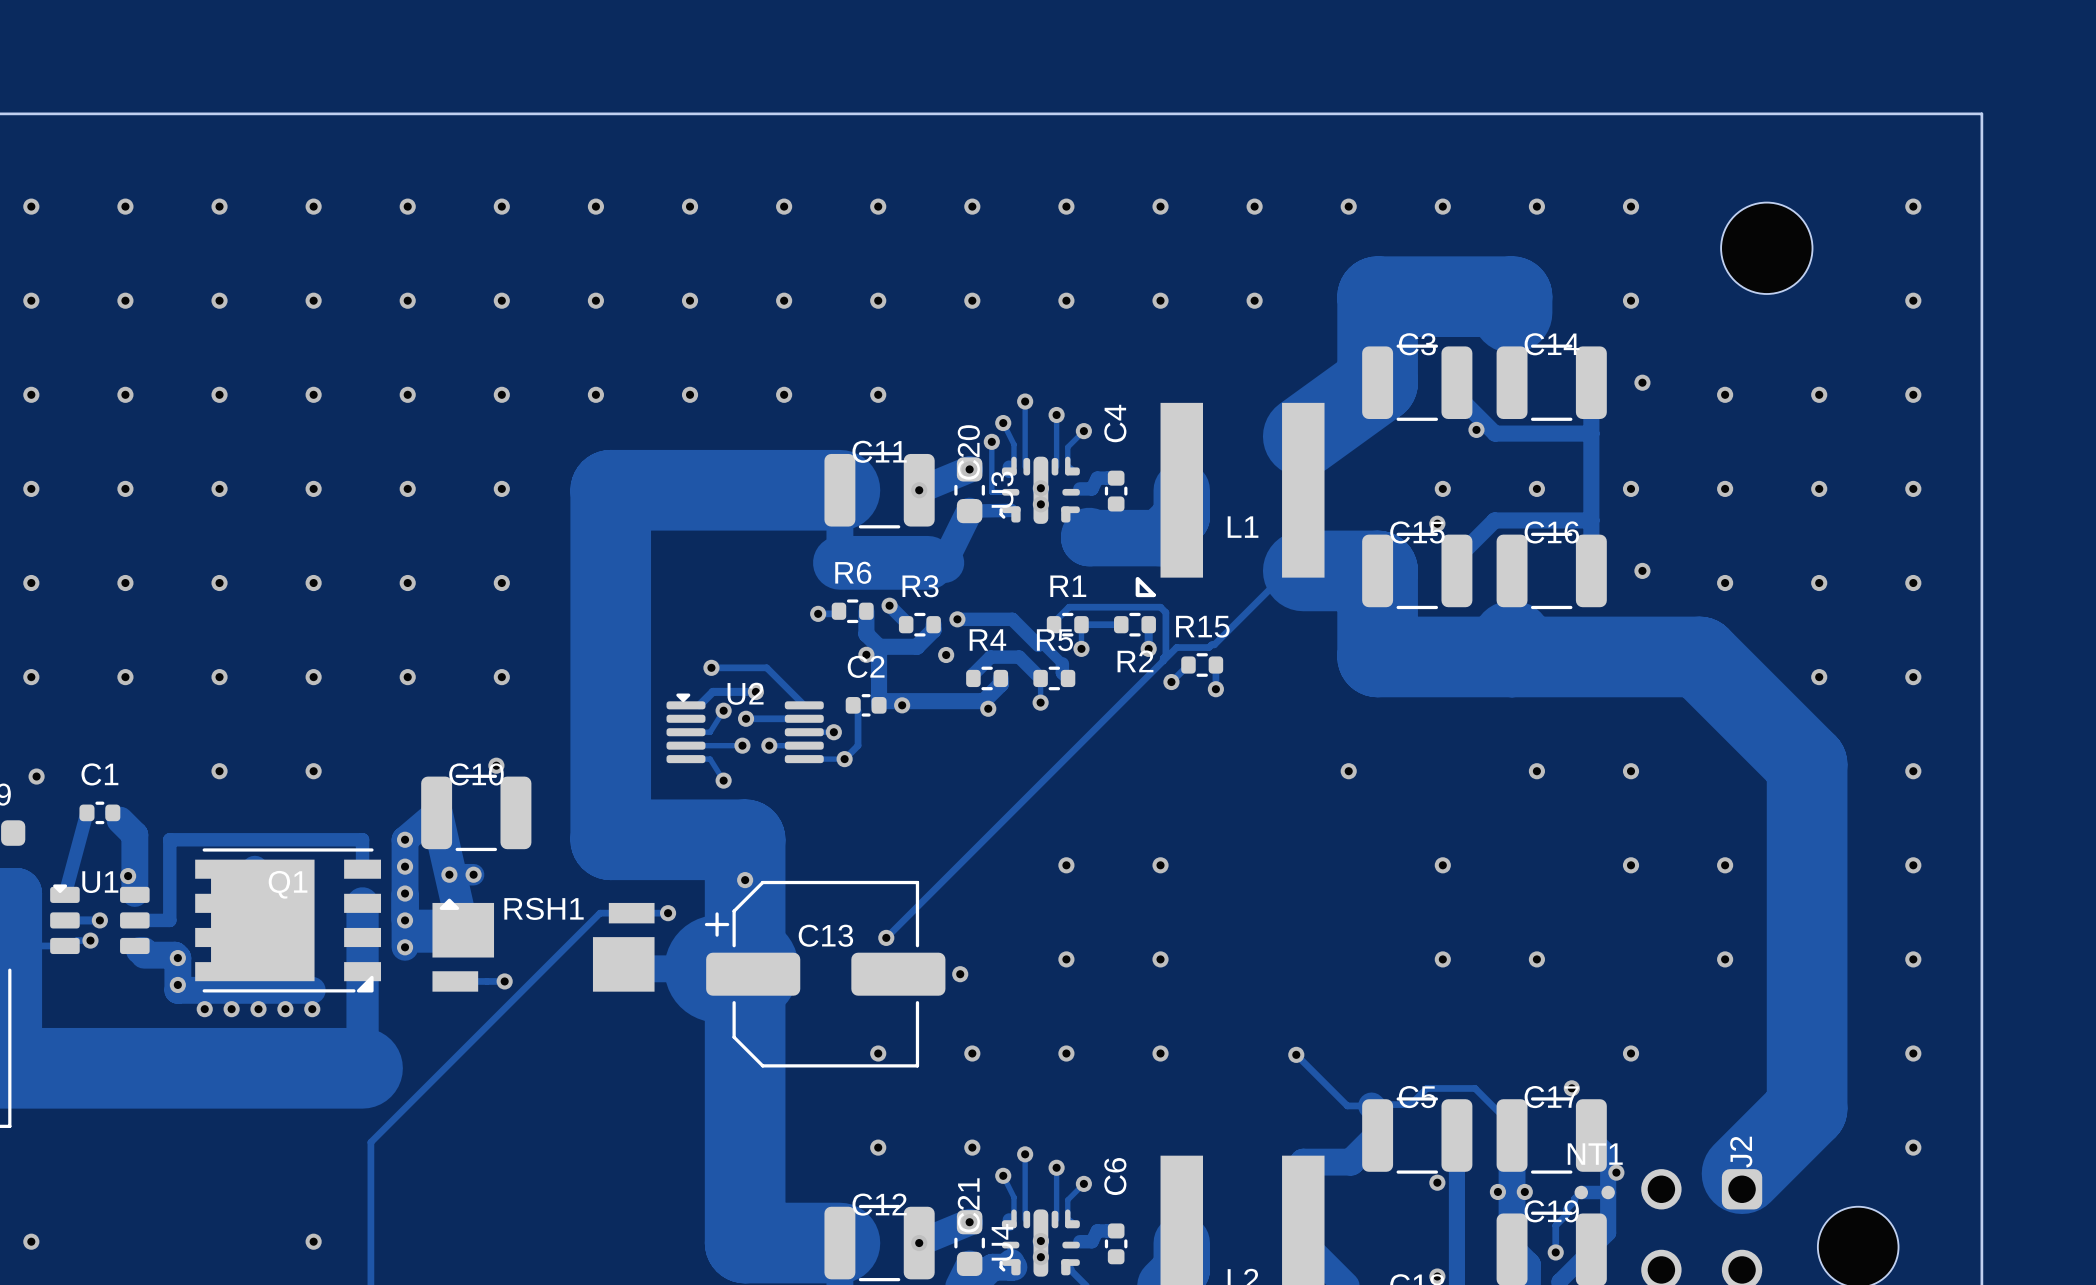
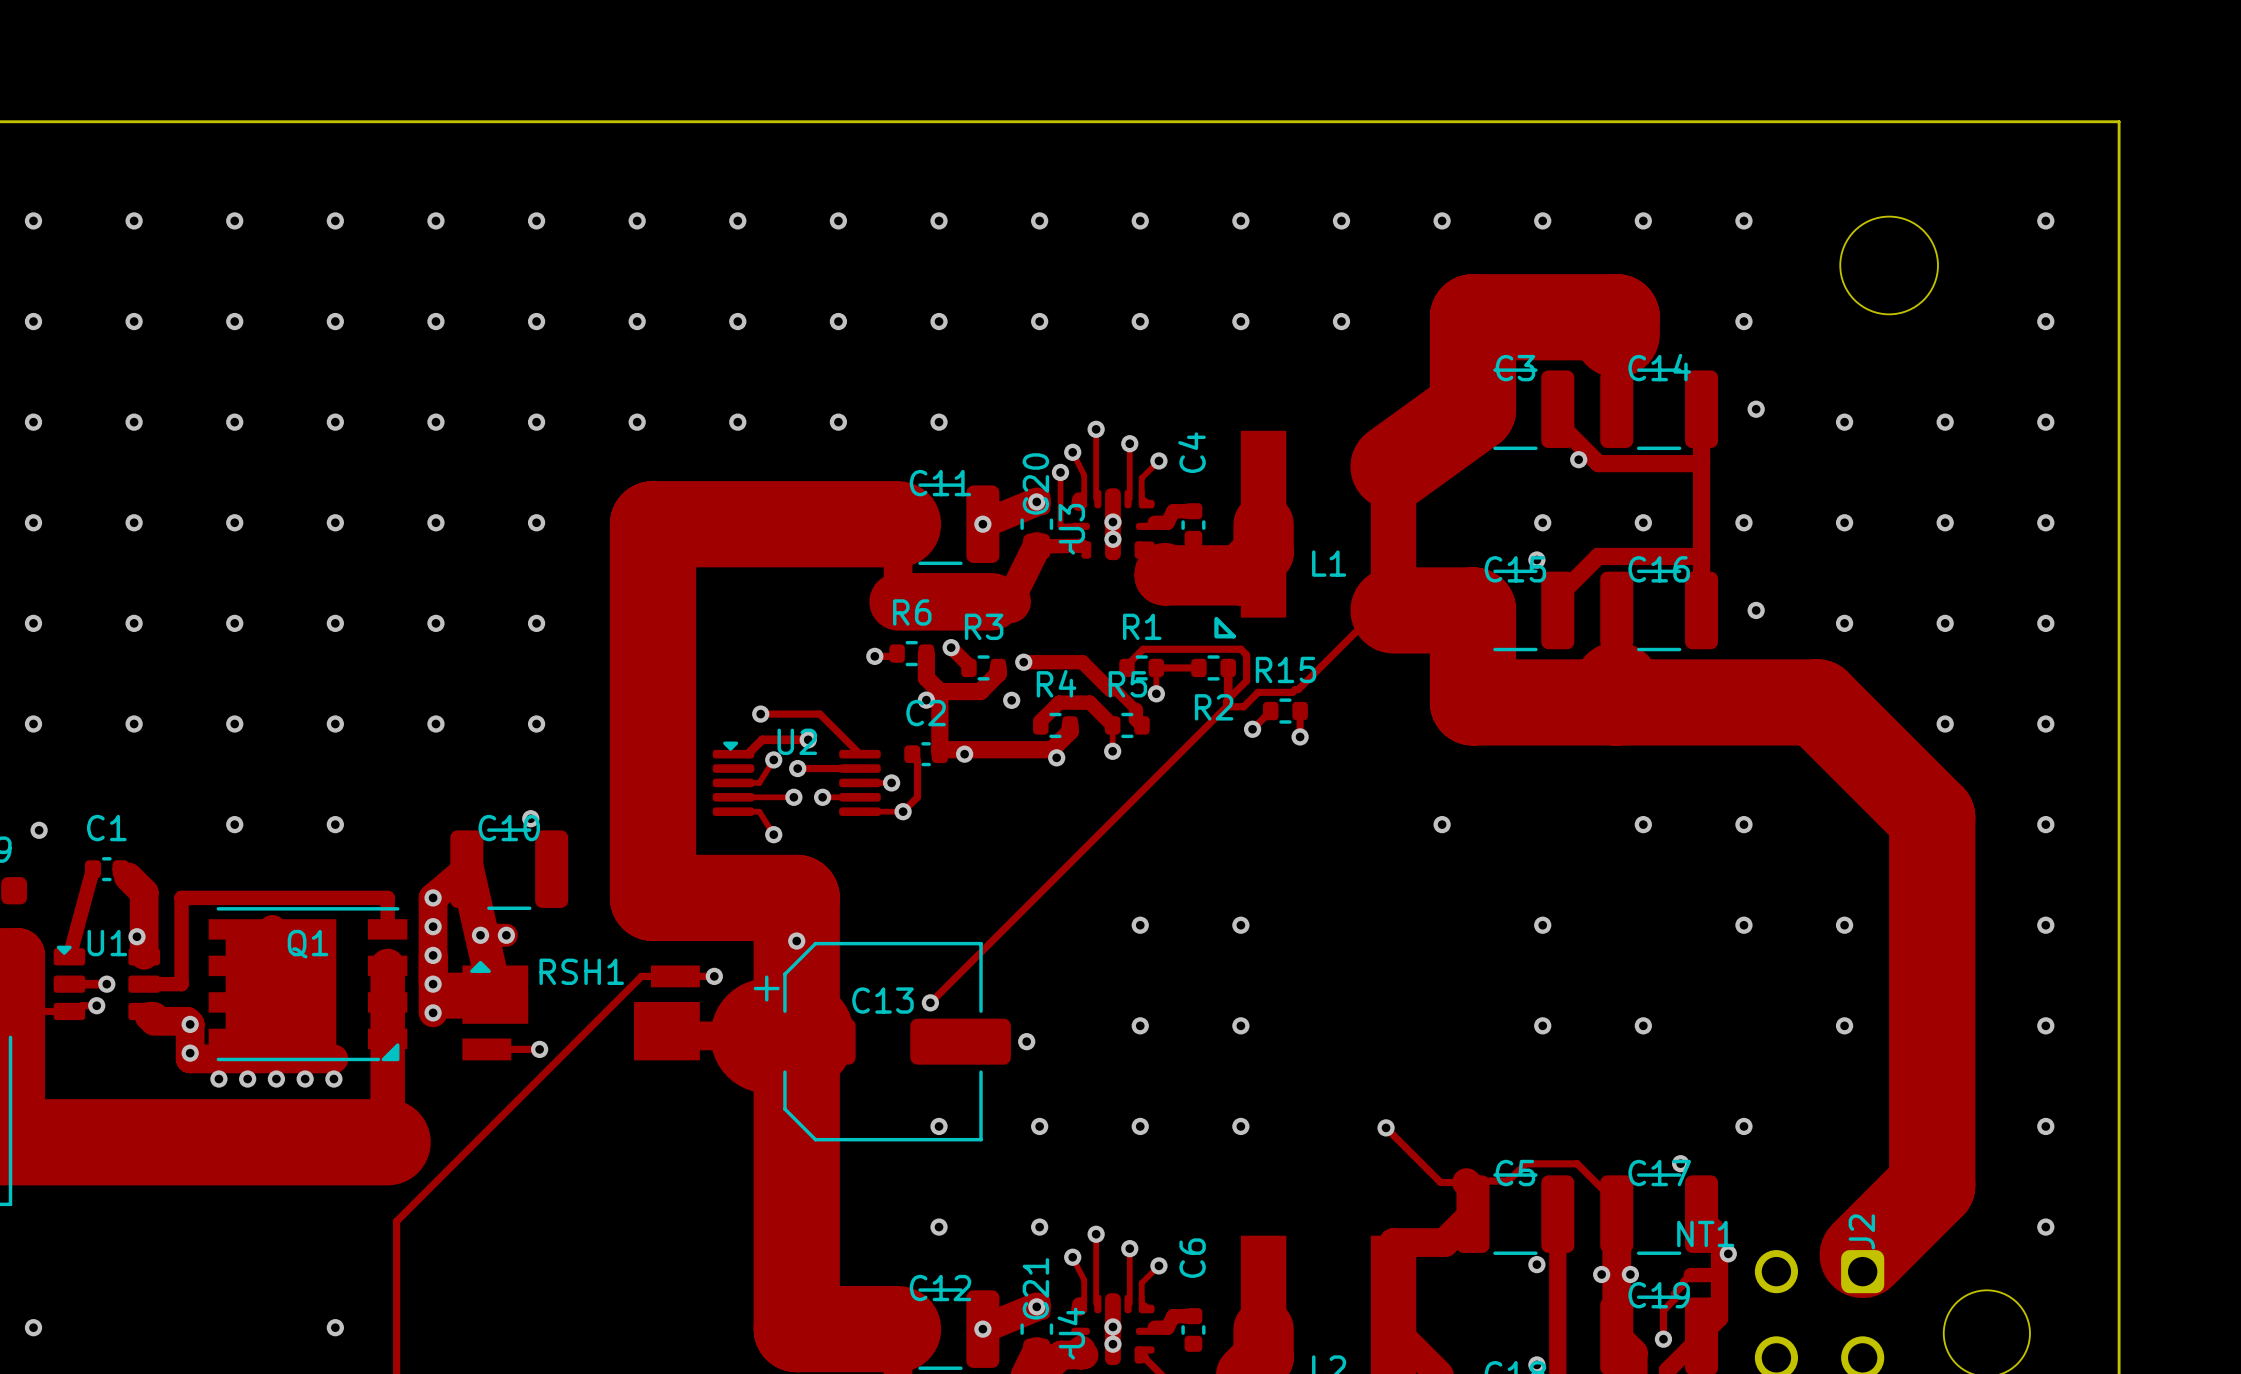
track: (1165, 636) (1165, 655) (1163, 660) (886, 937) -> (1246, 680) (1226, 701) (1226, 706)
via: (1148, 648) -> none
track: none -> (1226, 706) (1243, 706)
track: none -> (1226, 706) (930, 1002)
via position: (886, 937) -> (930, 1002)

